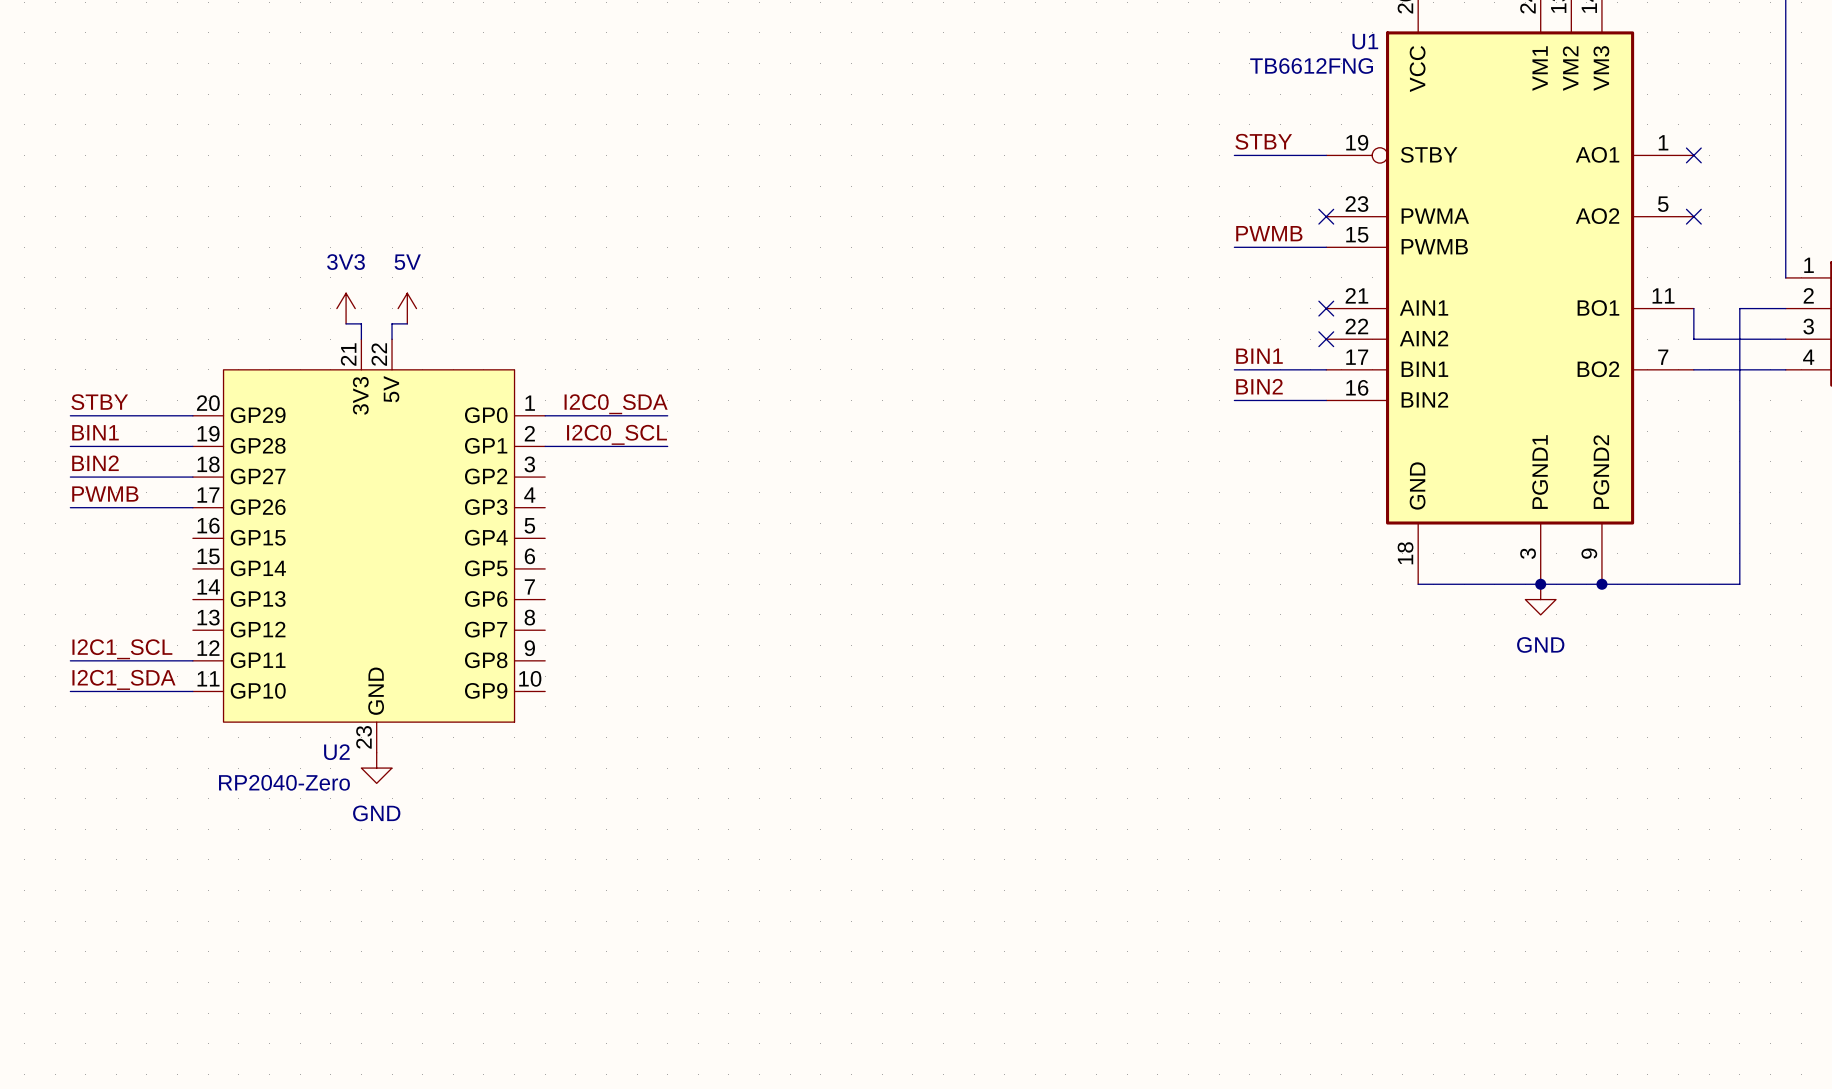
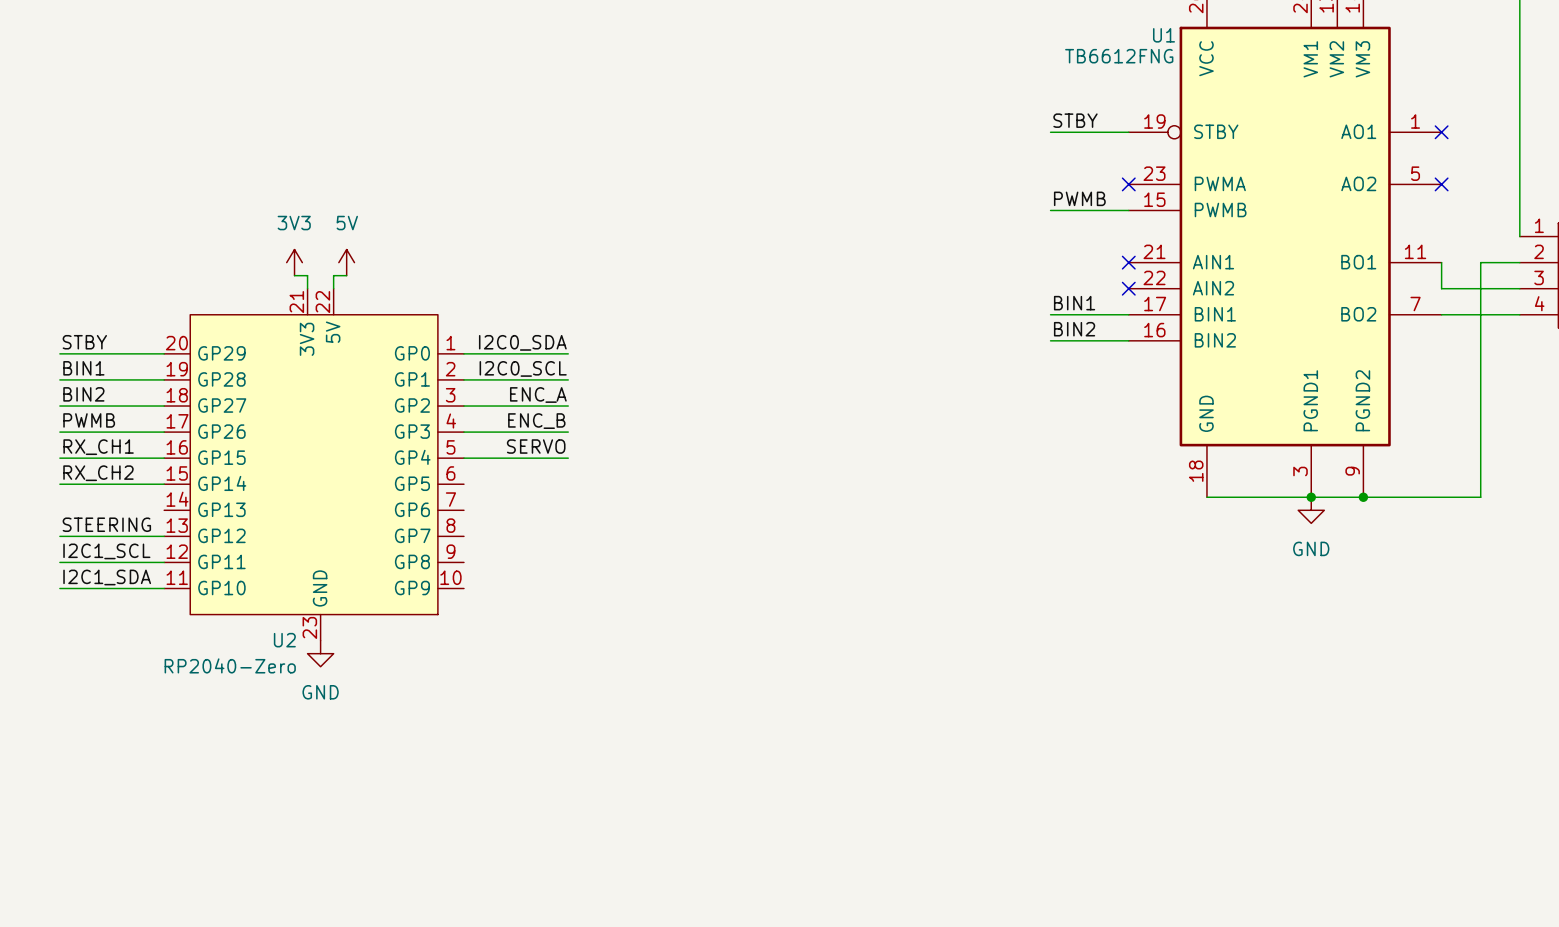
label: none -> ENC_A (538, 395)
wire: none -> (463, 406) (568, 406)
label: none -> ENC_B (536, 421)
wire: none -> (463, 432) (568, 432)
label: none -> SERVO (536, 446)
label: none -> RX_CH1 (98, 447)
wire: none -> (59, 458) (164, 458)
wire: none -> (463, 458) (568, 458)
label: none -> RX_CH2 (98, 473)
wire: none -> (59, 484) (164, 484)
label: none -> STEERING (106, 524)
wire: none -> (59, 536) (164, 536)

